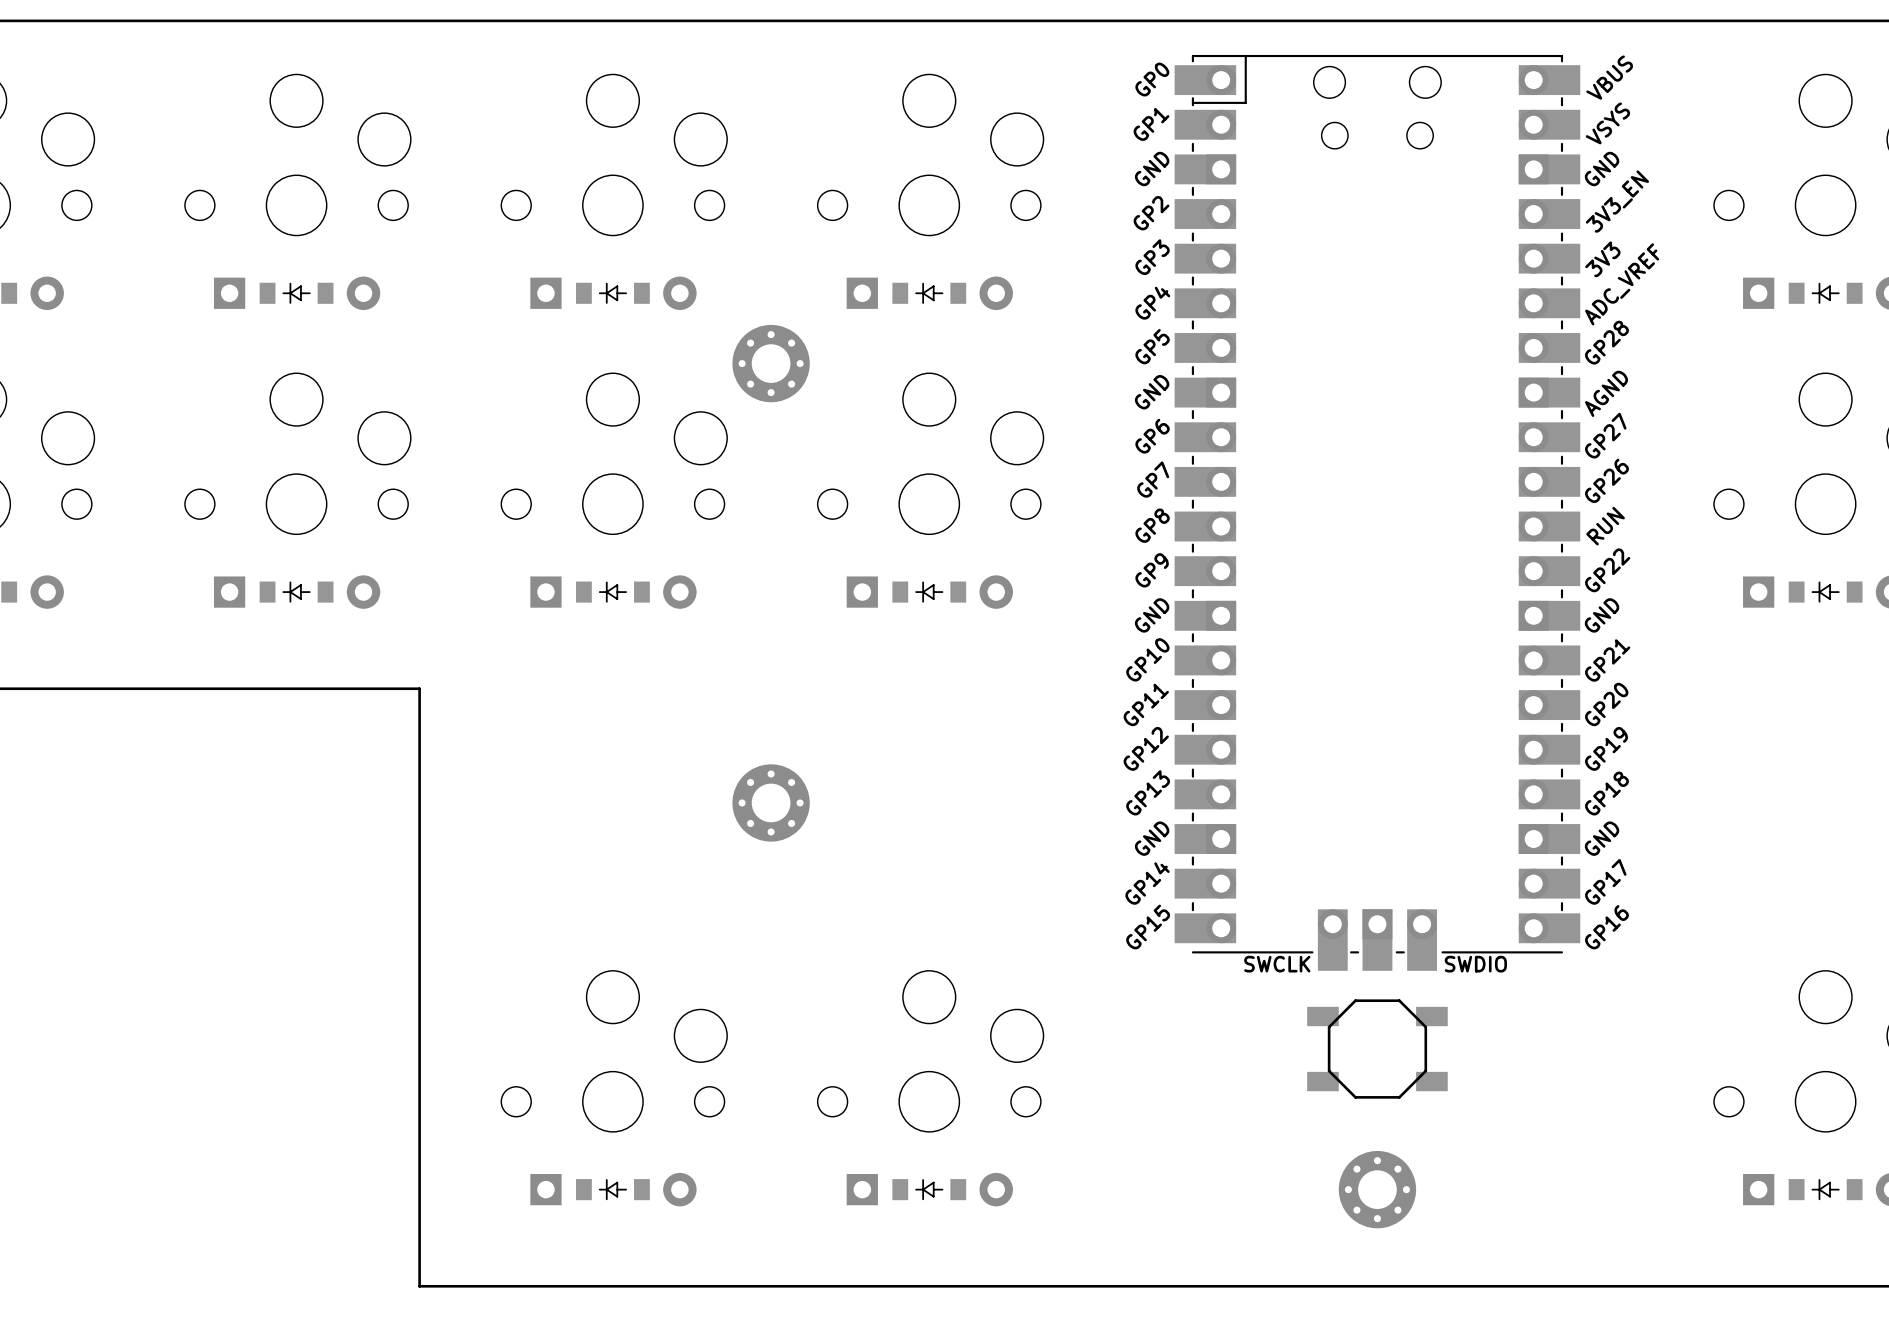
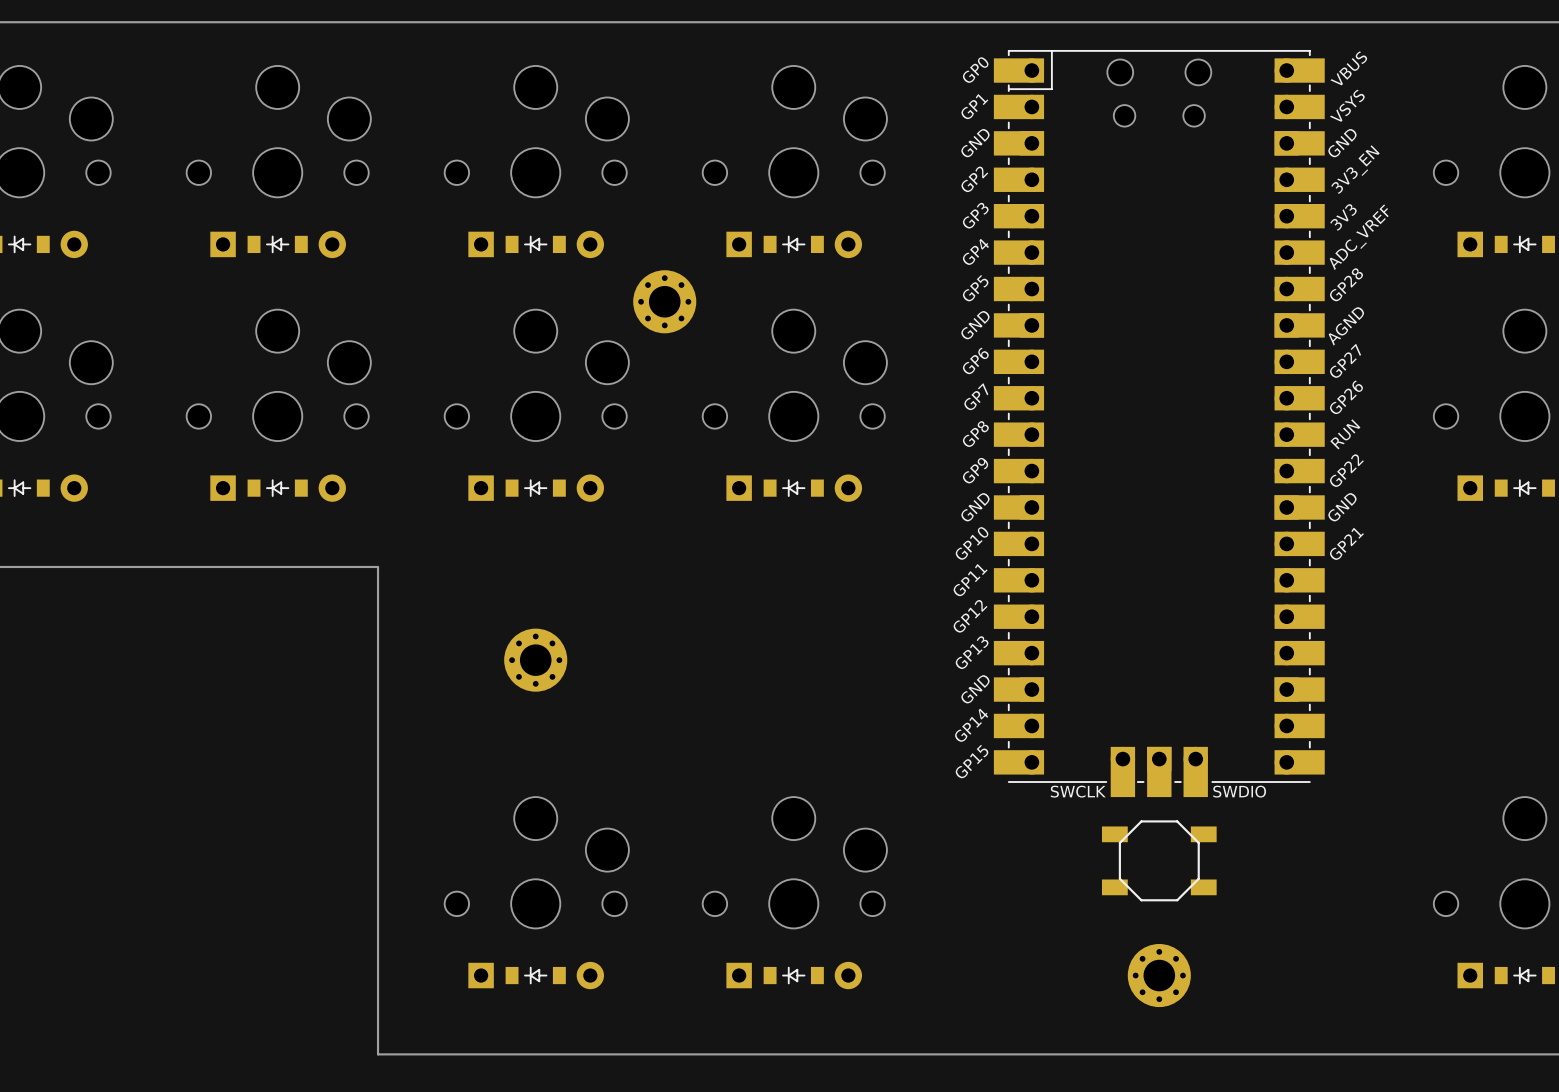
part text: GP20 (1606, 704) -> none
part text: GP19 (1606, 748) -> none
part text: GP18 (1606, 793) -> none
part position: (771, 802) -> (535, 660)
part text: GND (1602, 838) -> none
part text: GP17 (1605, 881) -> none
part text: GP16 (1606, 927) -> none

